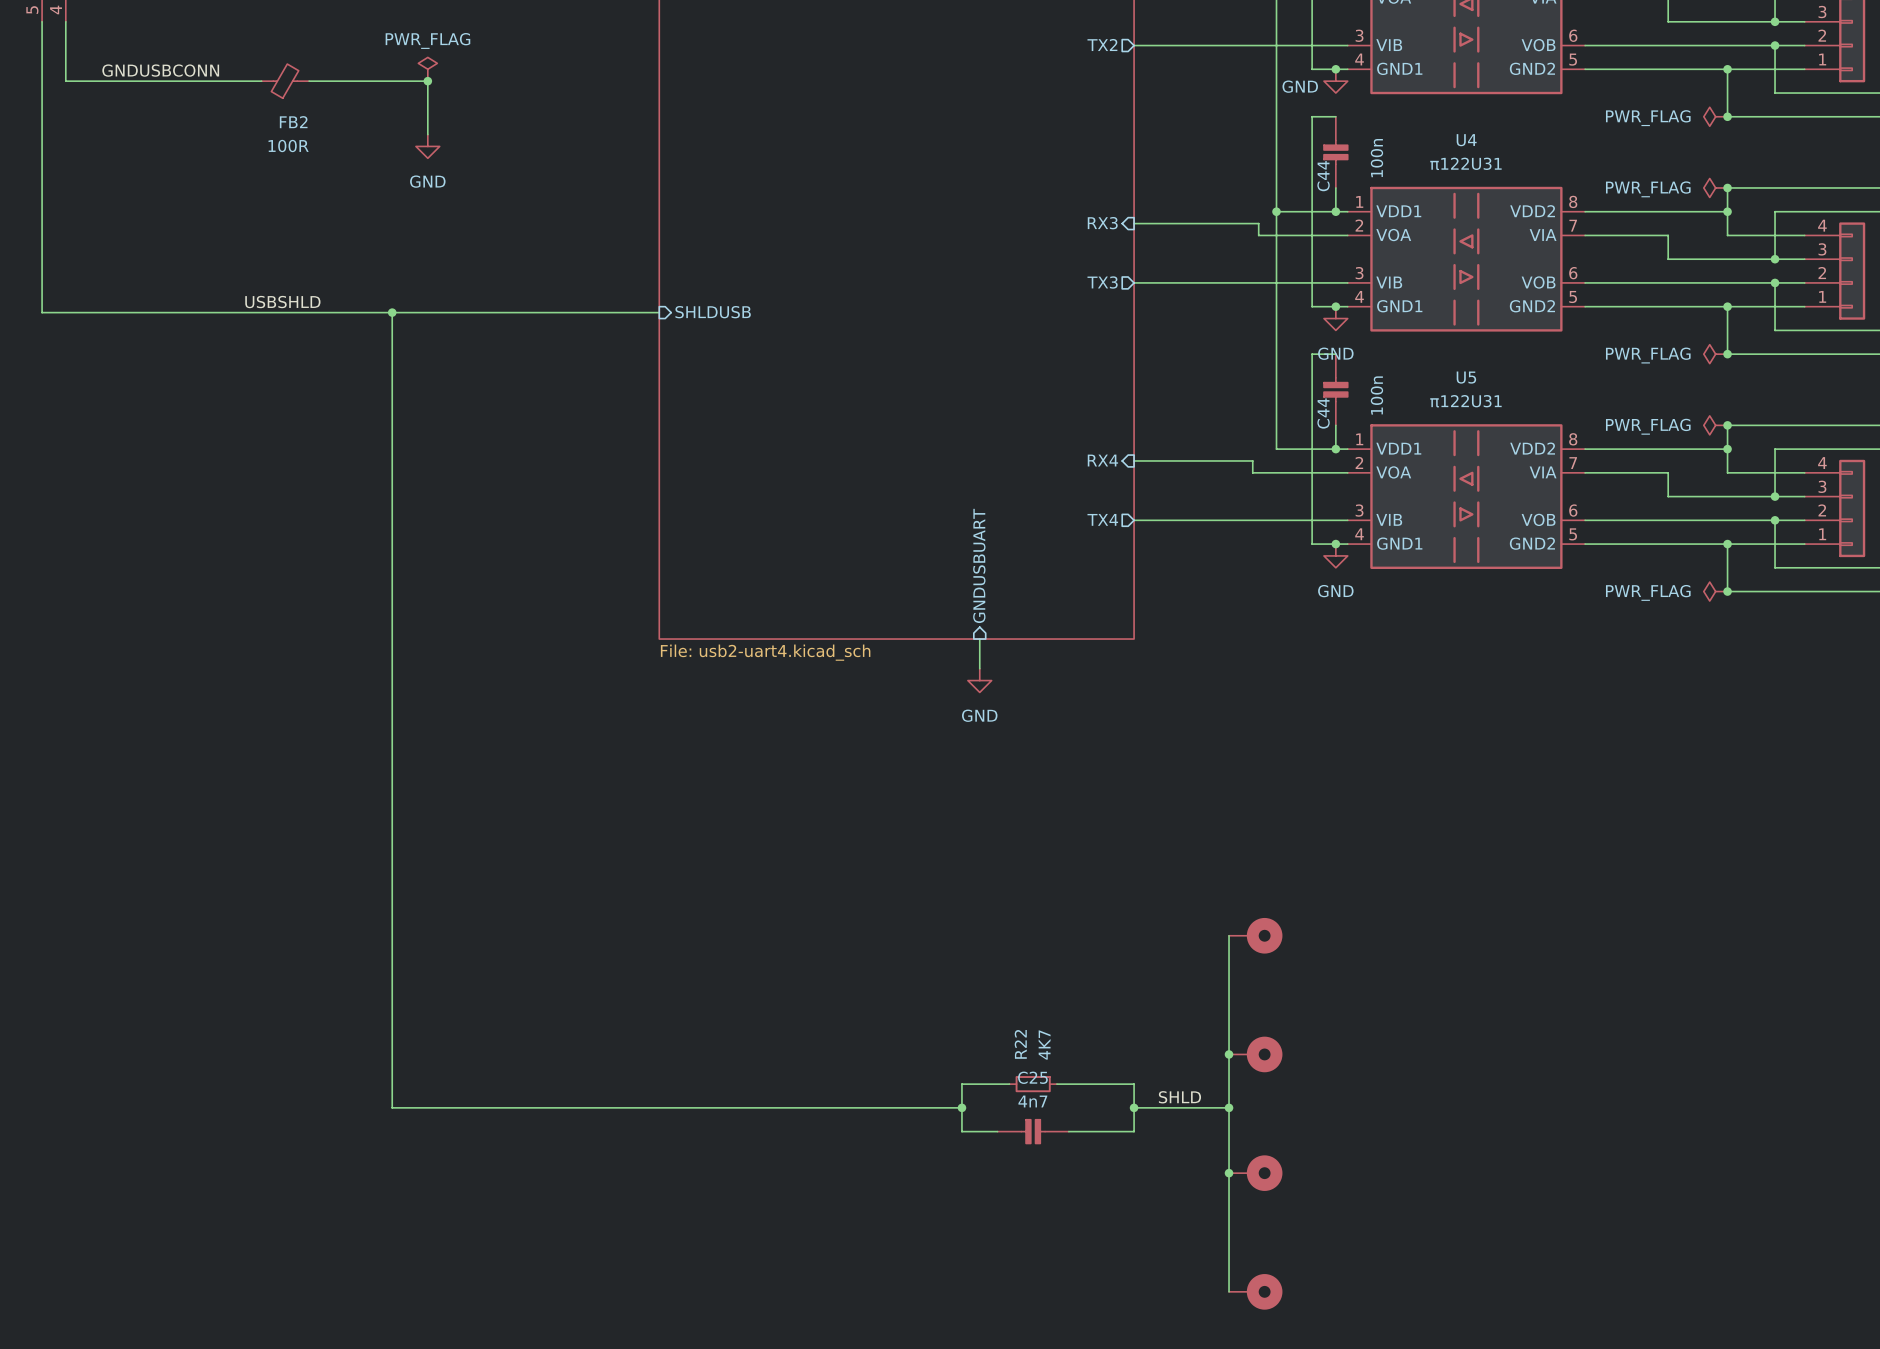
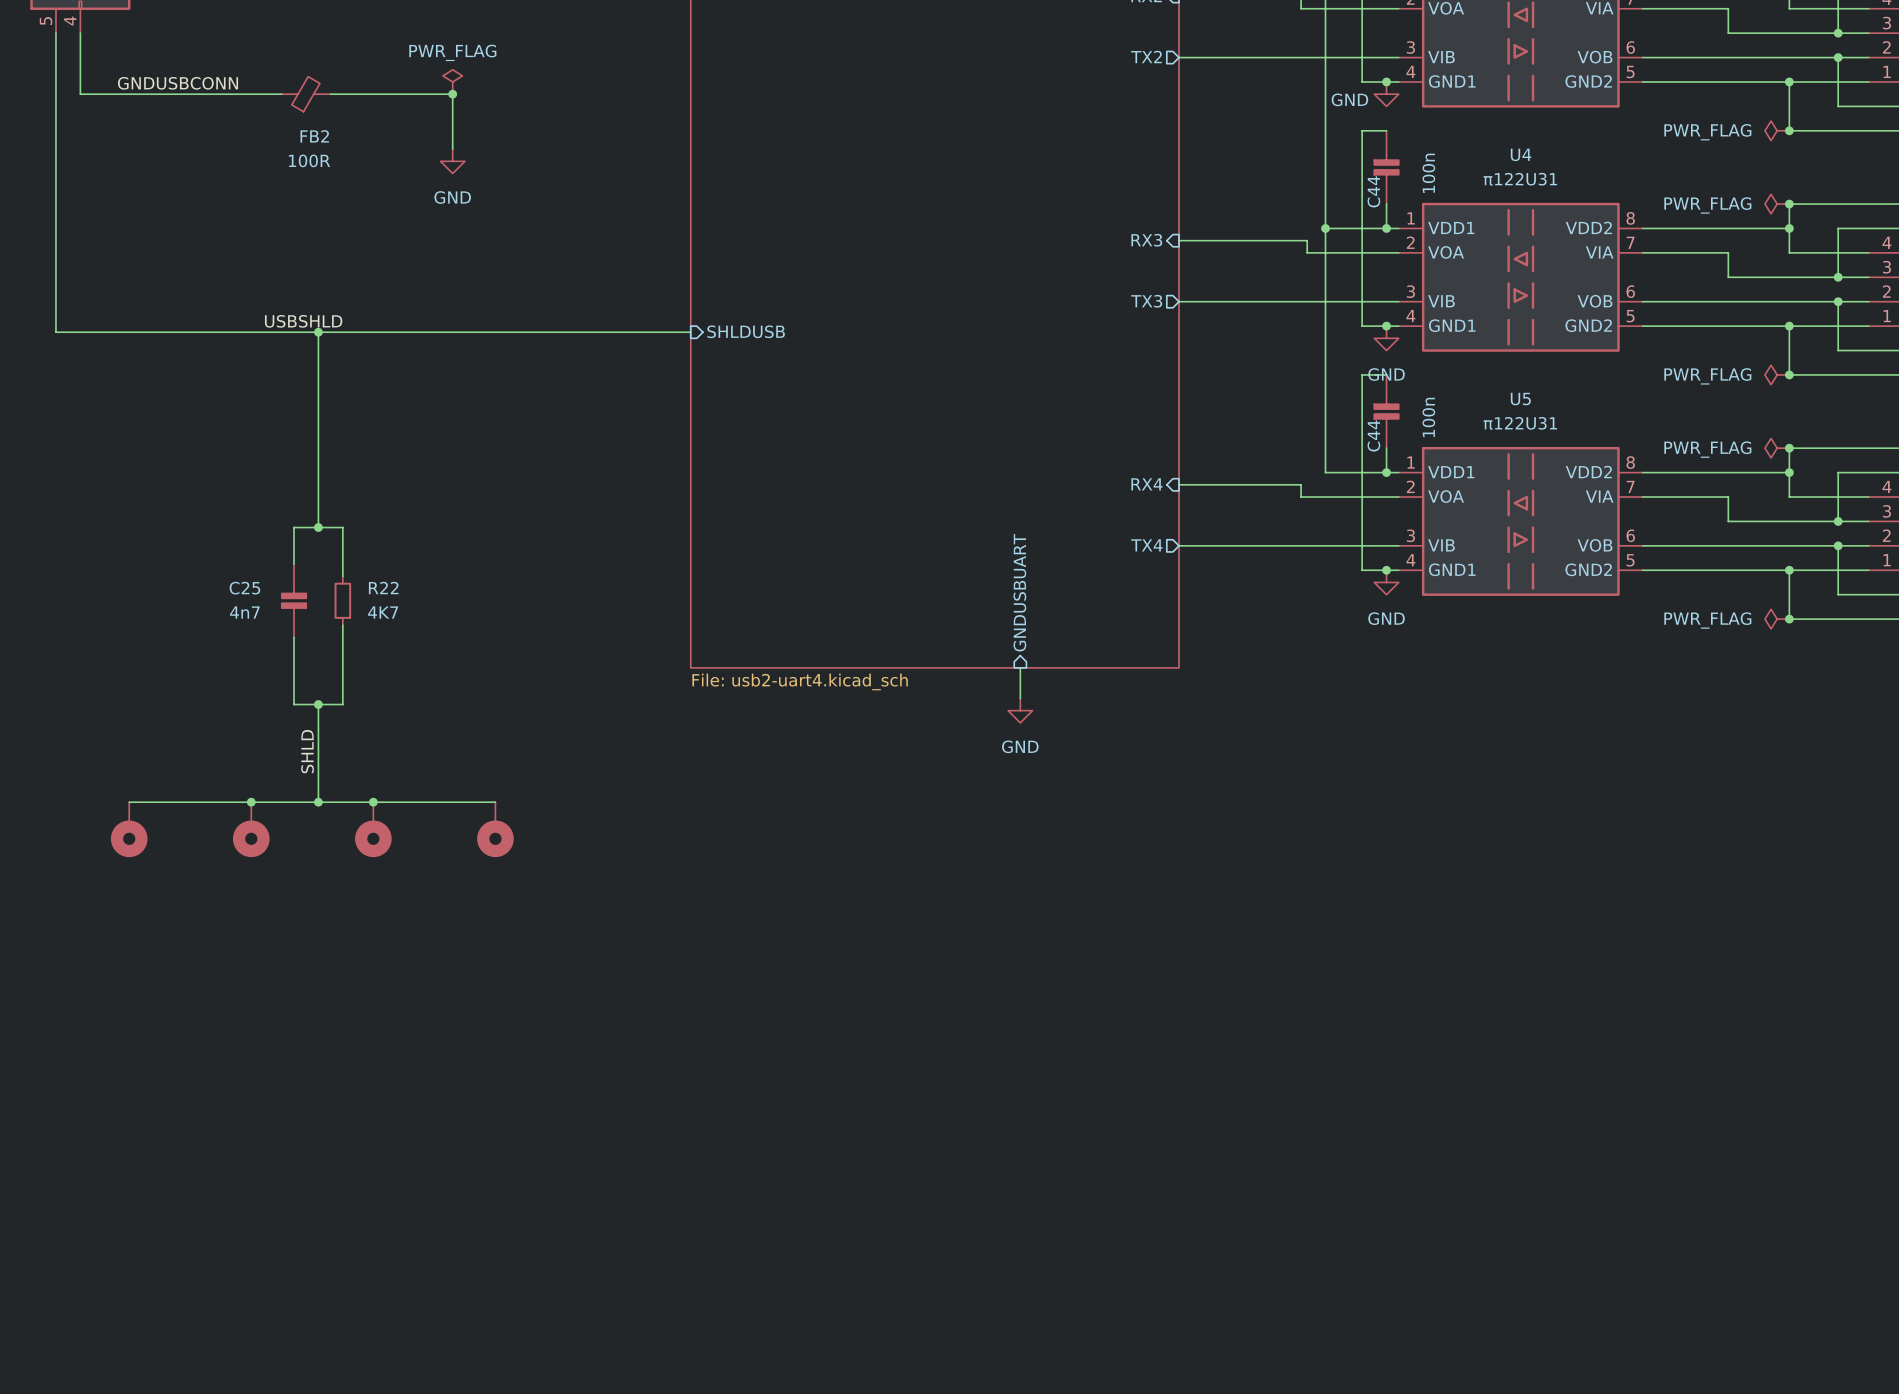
wire: none -> (318, 332) (318, 527)
junction: none -> (318, 332)
wire: (392, 312) (392, 1107) (961, 1107) -> none
junction: (392, 312) -> none
junction: none -> (318, 527)
wire: none -> (294, 564) (294, 527) (342, 527) (342, 576)
wire: none -> (342, 625) (342, 704) (294, 704) (294, 637)
wire: none -> (318, 704) (318, 802)
junction: none -> (318, 704)
label: none -> SHLD (307, 751)
wire: none -> (129, 802) (495, 802)
junction: none -> (251, 802)
junction: none -> (318, 802)
junction: none -> (373, 802)
part: none -> (129, 829)
part: none -> (251, 829)
part: none -> (373, 829)
part: none -> (495, 829)
wire: (1229, 935) (1229, 1291) -> none
part: (1255, 935) -> none
junction: (1229, 1054) -> none
part: (1255, 1054) -> none
C25 name position: C25 (1032, 1077) -> C25 (244, 588)
wire: (1009, 1084) (961, 1084) (961, 1131) (997, 1131) -> none
R22 rotation: 0° (1033, 1084) -> 90° clockwise (342, 600)
R22 position: (1033, 1084) -> (342, 600)
wire: (1056, 1084) (1134, 1084) (1134, 1131) (1068, 1131) -> none
label: SHLD (1179, 1097) -> none
C25 value position: 4n7 (1032, 1101) -> 4n7 (244, 612)
junction: (961, 1107) -> none
wire: (1134, 1107) (1229, 1107) -> none
junction: (1134, 1107) -> none
junction: (1229, 1107) -> none
C25 rotation: 0° (1033, 1131) -> 90° clockwise (294, 600)
C25 position: (1033, 1131) -> (294, 600)
junction: (1229, 1173) -> none
part: (1255, 1173) -> none
part: (1255, 1291) -> none

